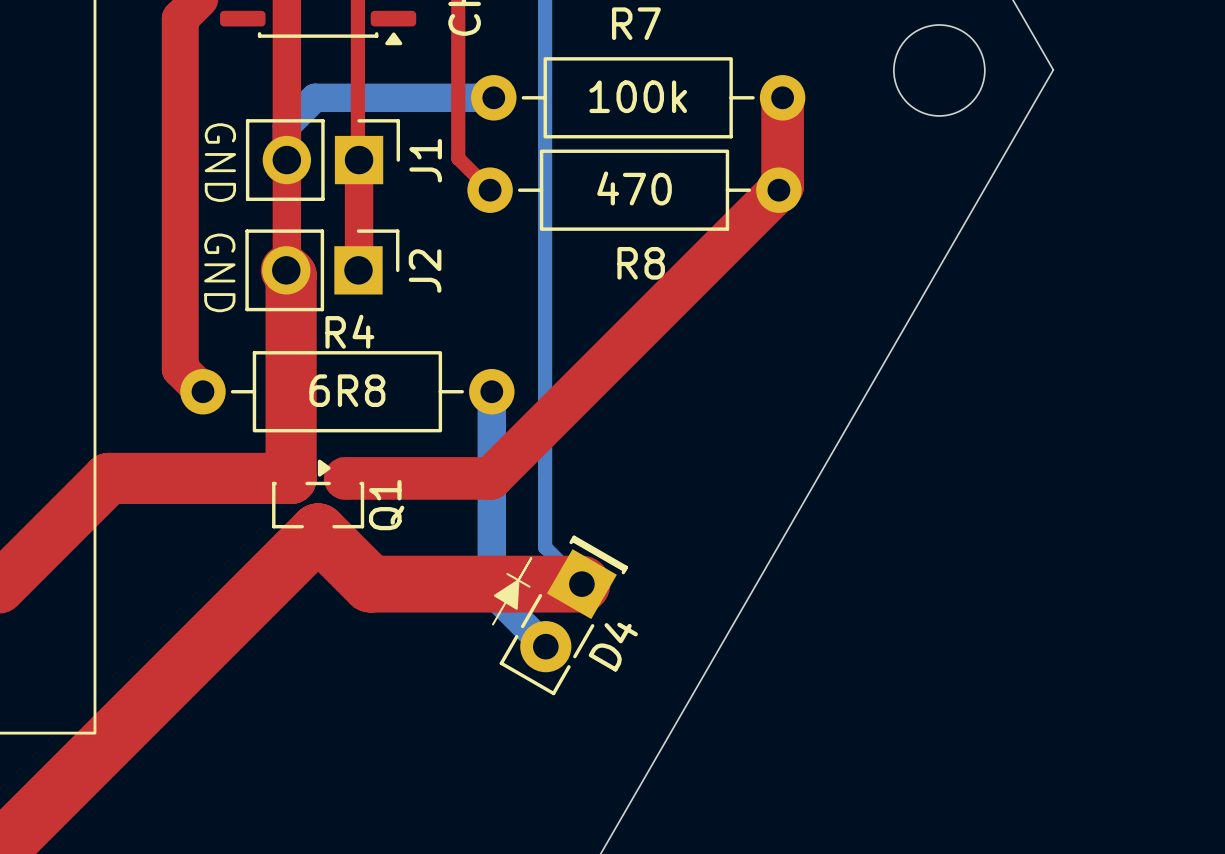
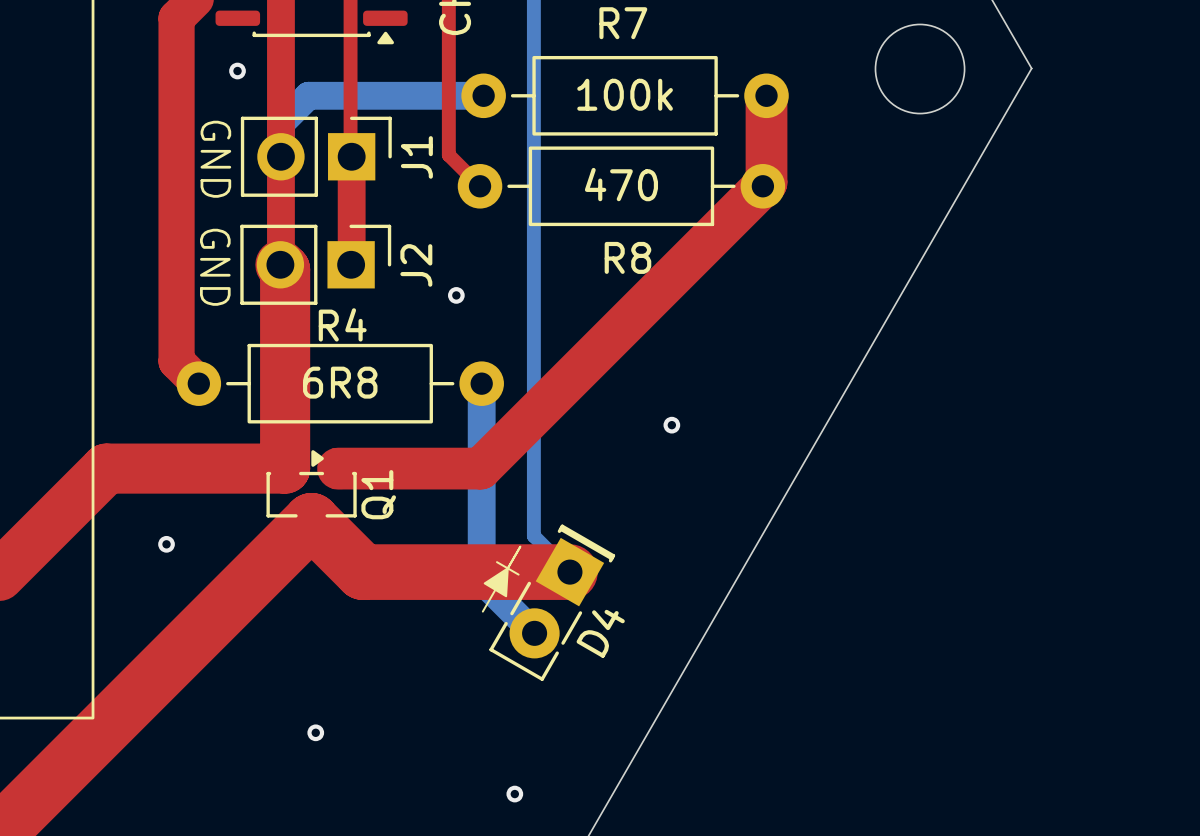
via: none -> (237, 71)
via: none -> (456, 295)
via: none -> (671, 425)
via: none -> (166, 544)
via: none -> (315, 732)
via: none -> (514, 794)

